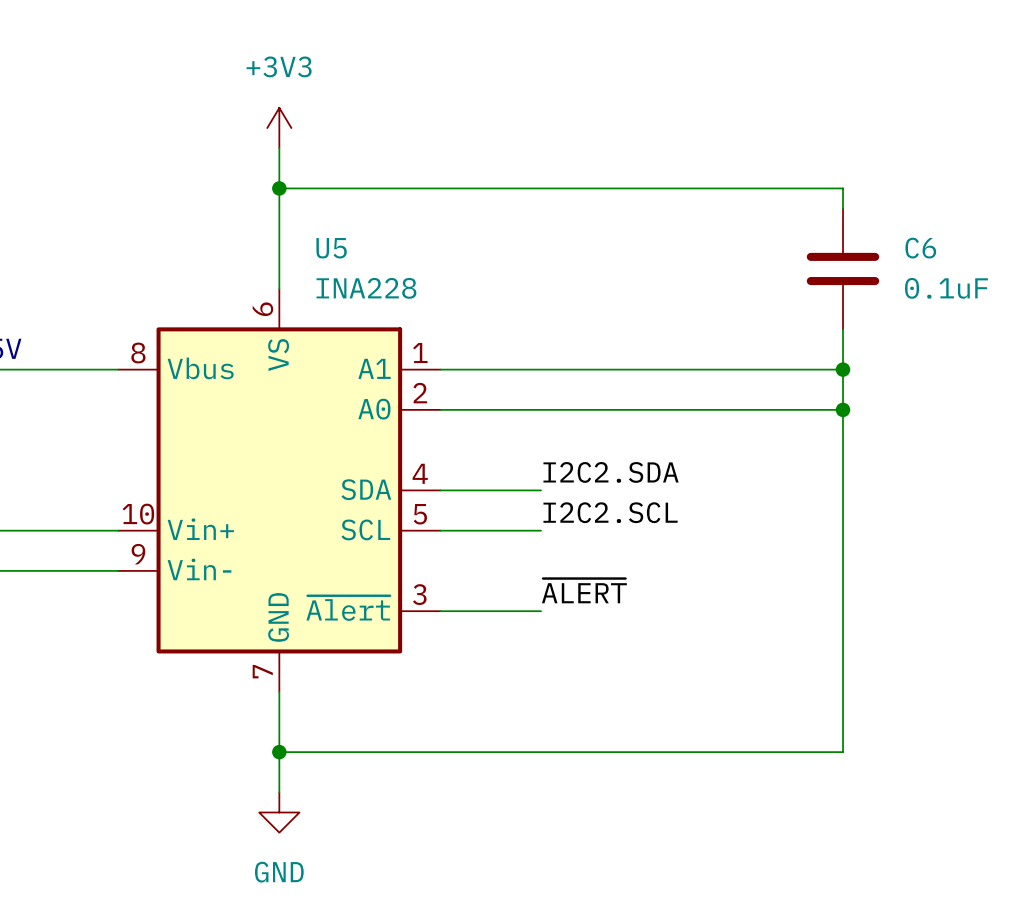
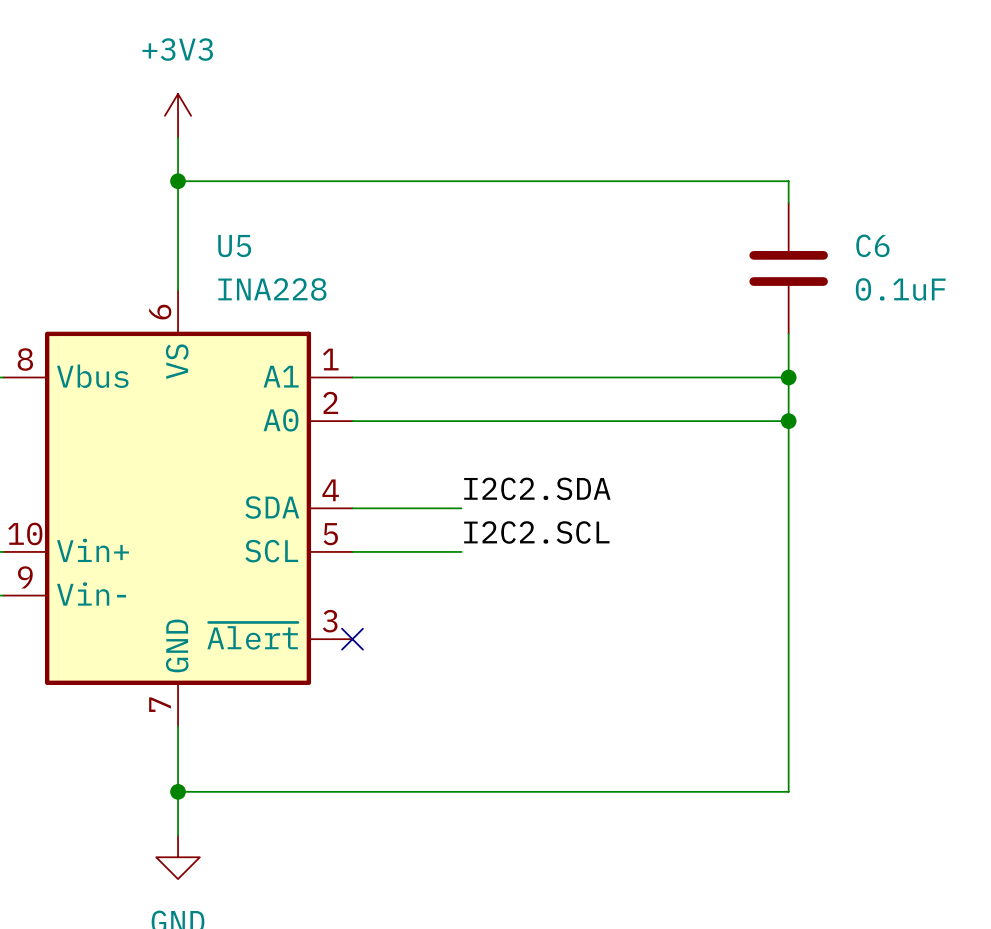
label: ~{ALERT} (584, 590) -> none
wire: (440, 611) (541, 611) -> none
no-connect mark: none -> (352, 639)

